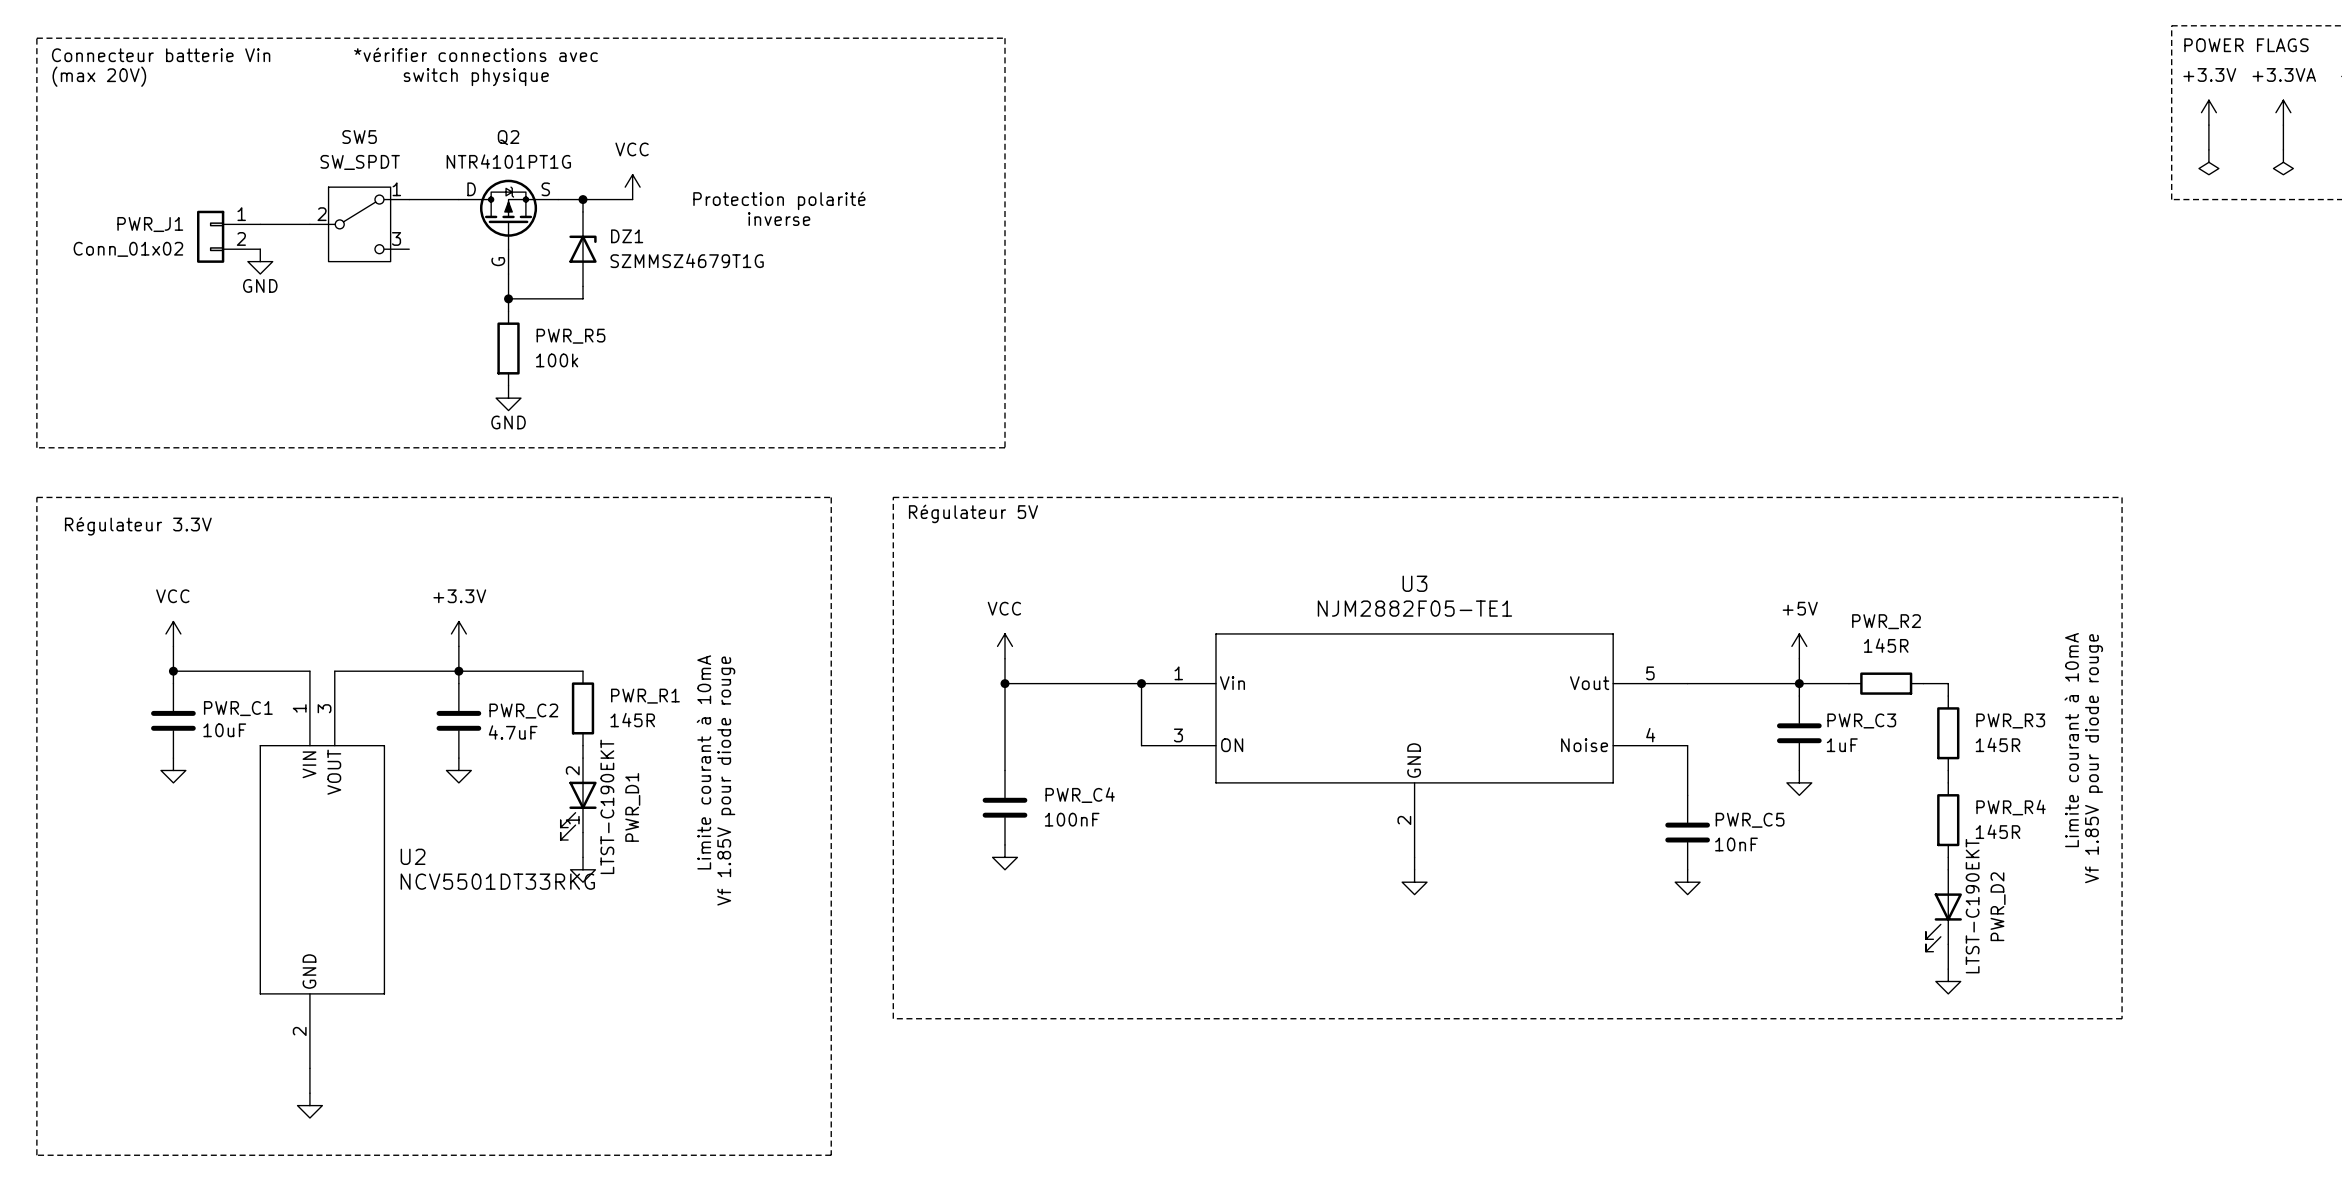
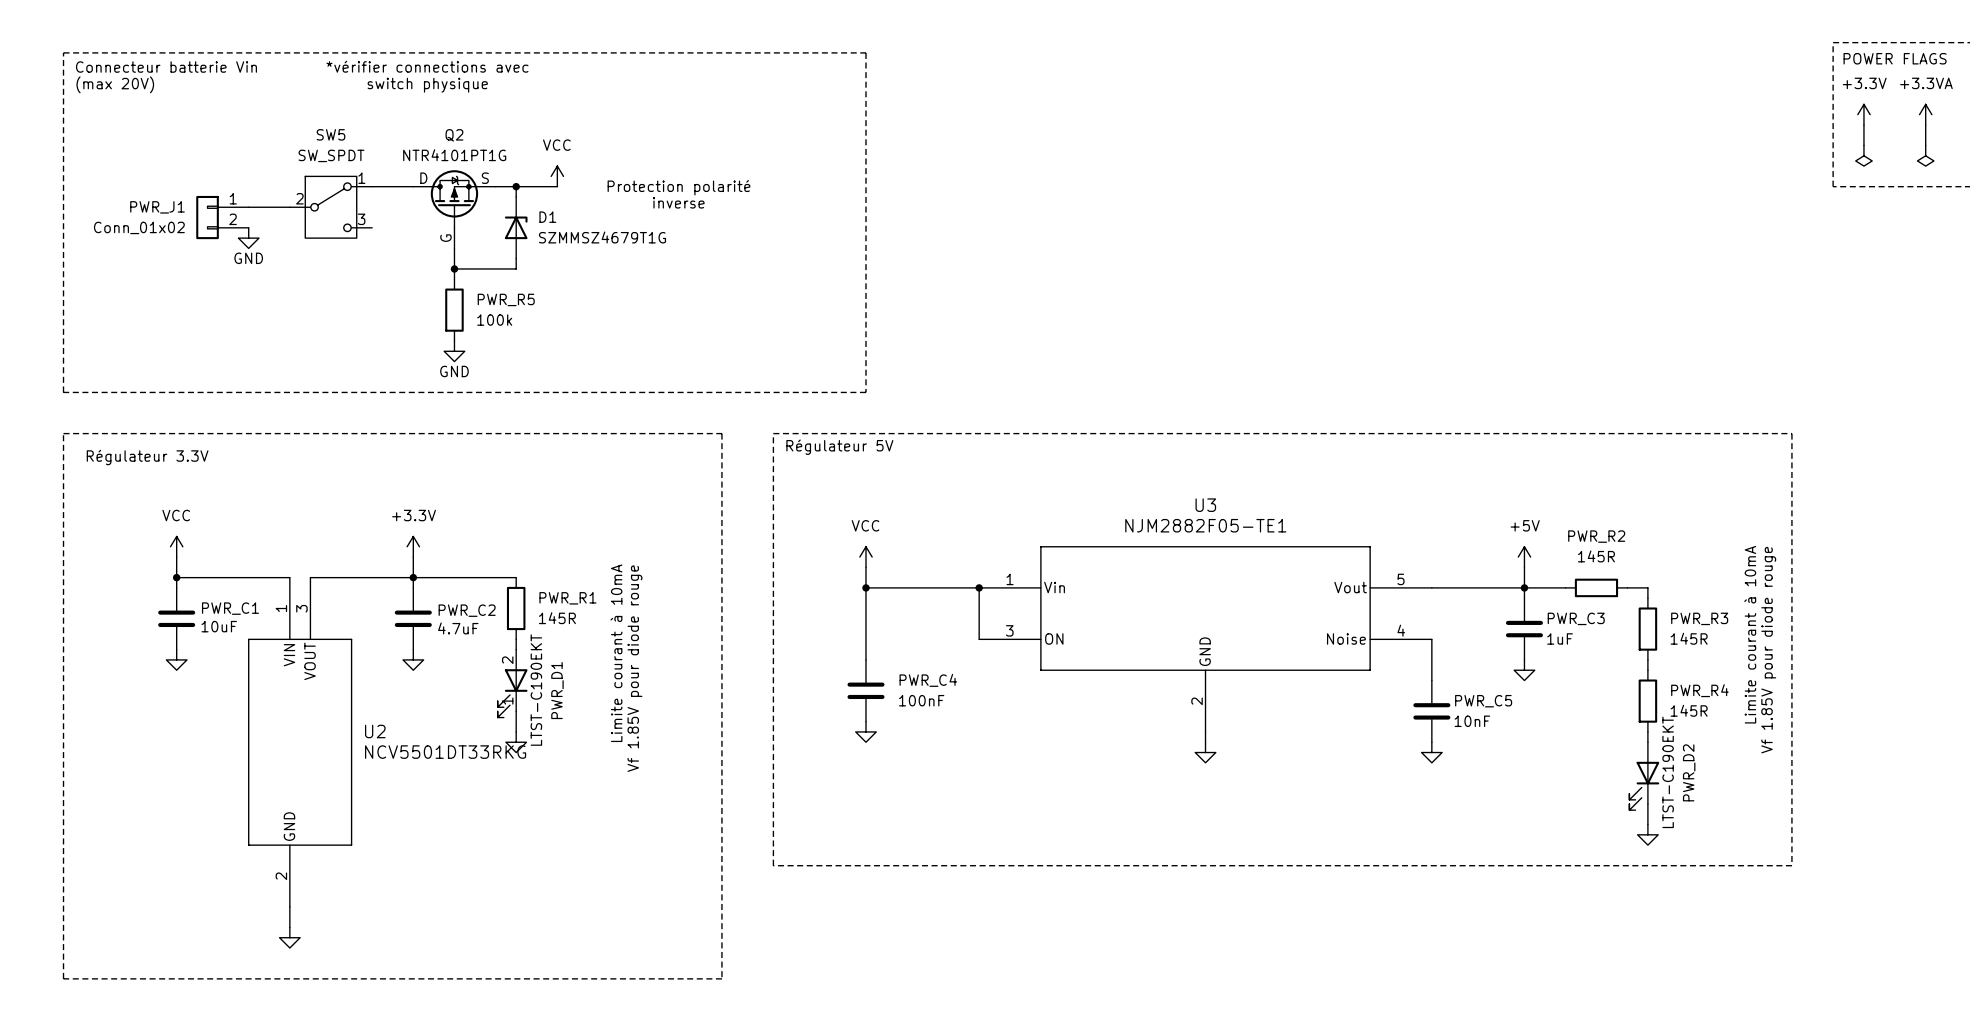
DZ1 name: DZ1 (627, 236) -> D1 (547, 217)

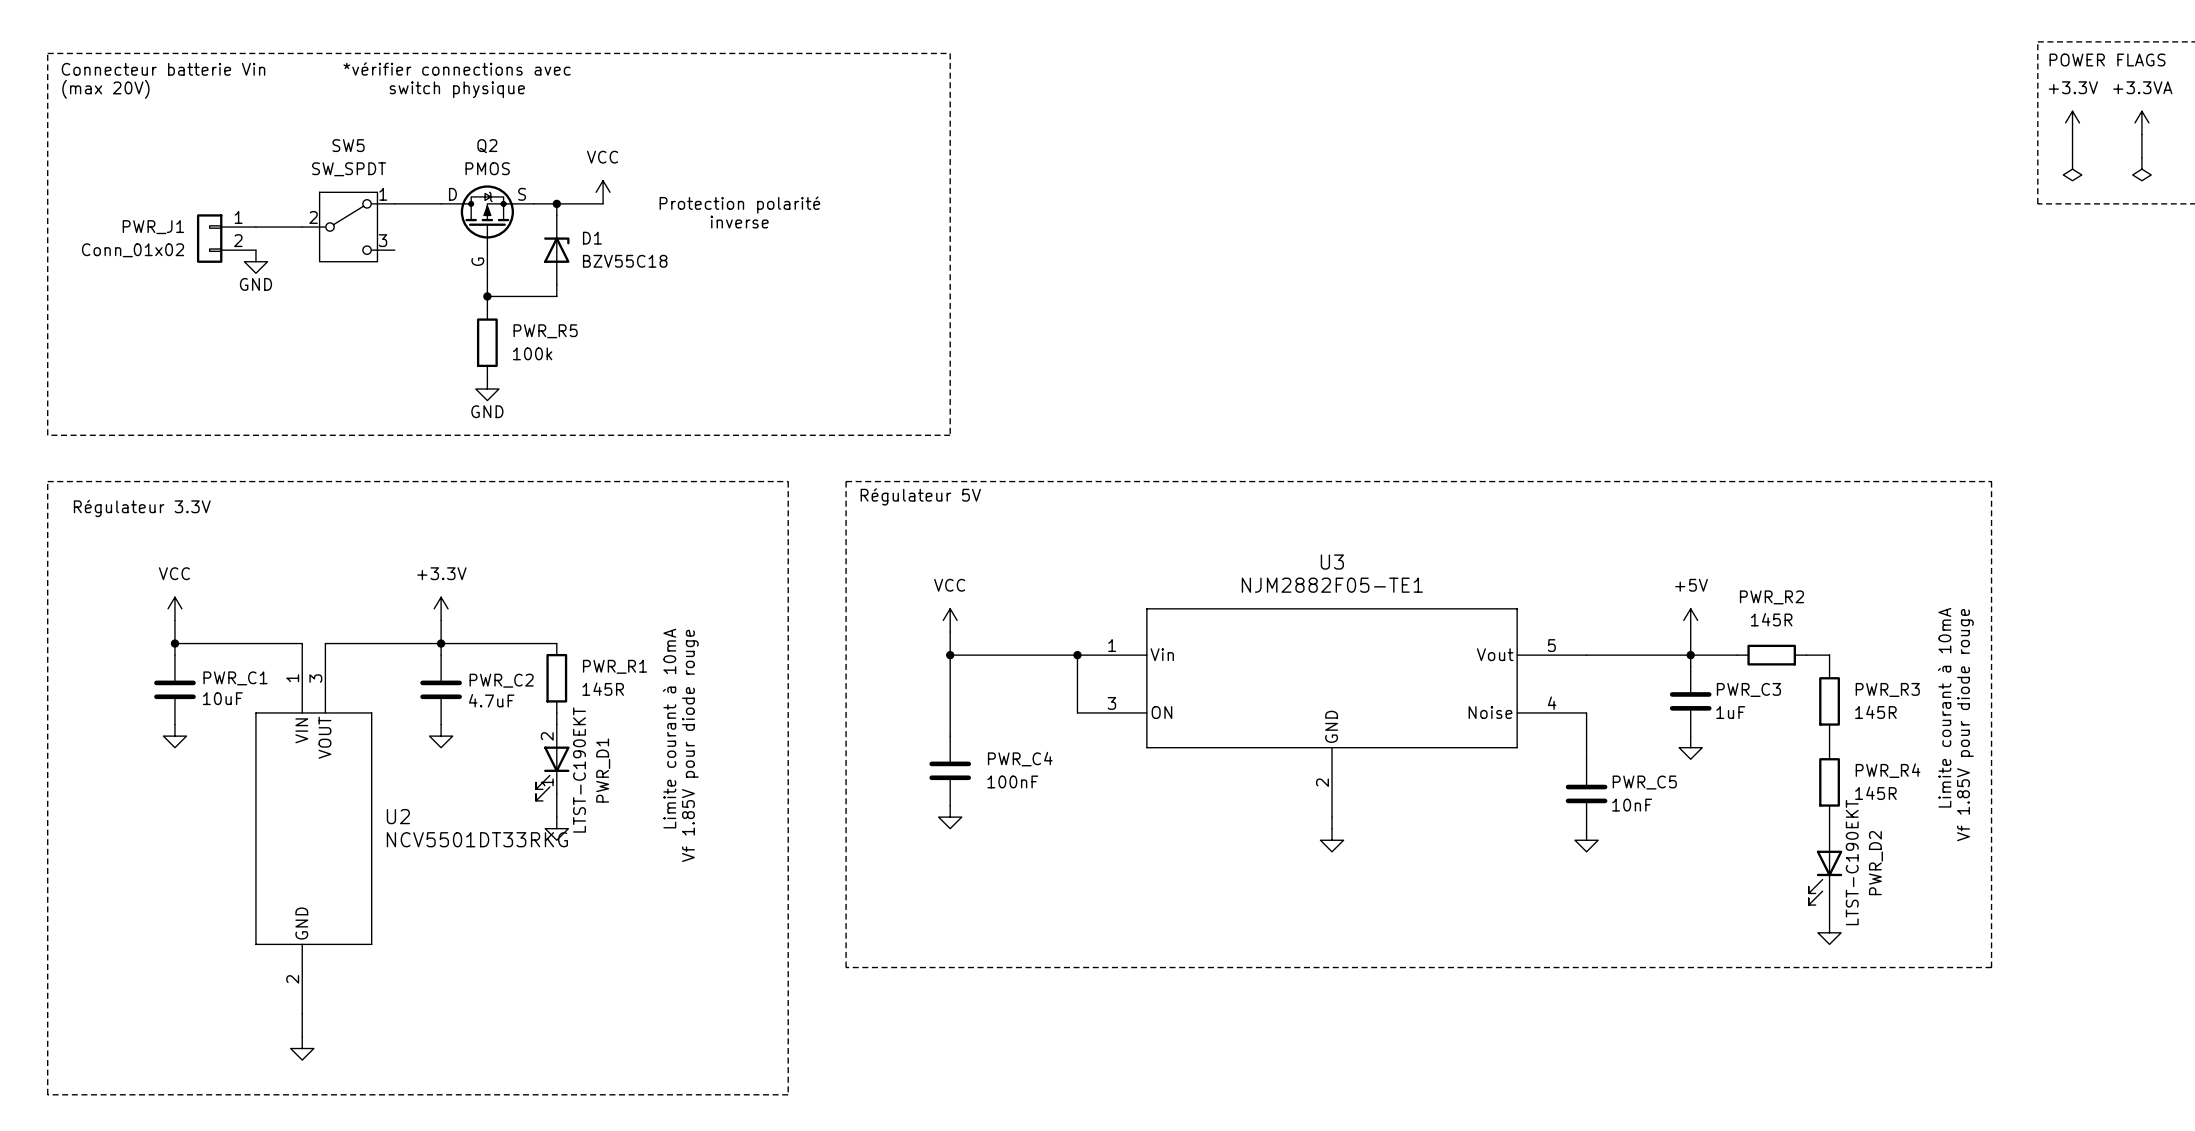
Q2 value: NTR4101PT1G (454, 155) -> PMOS (487, 168)
D1 value: SZMMSZ4679T1G (602, 237) -> BZV55C18 (625, 261)

